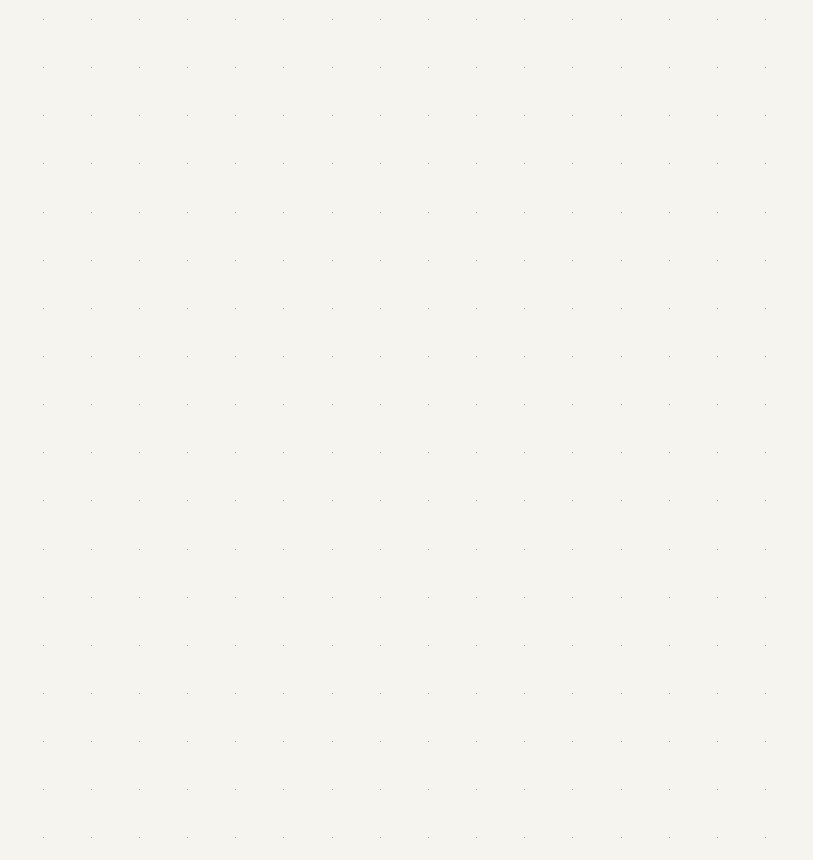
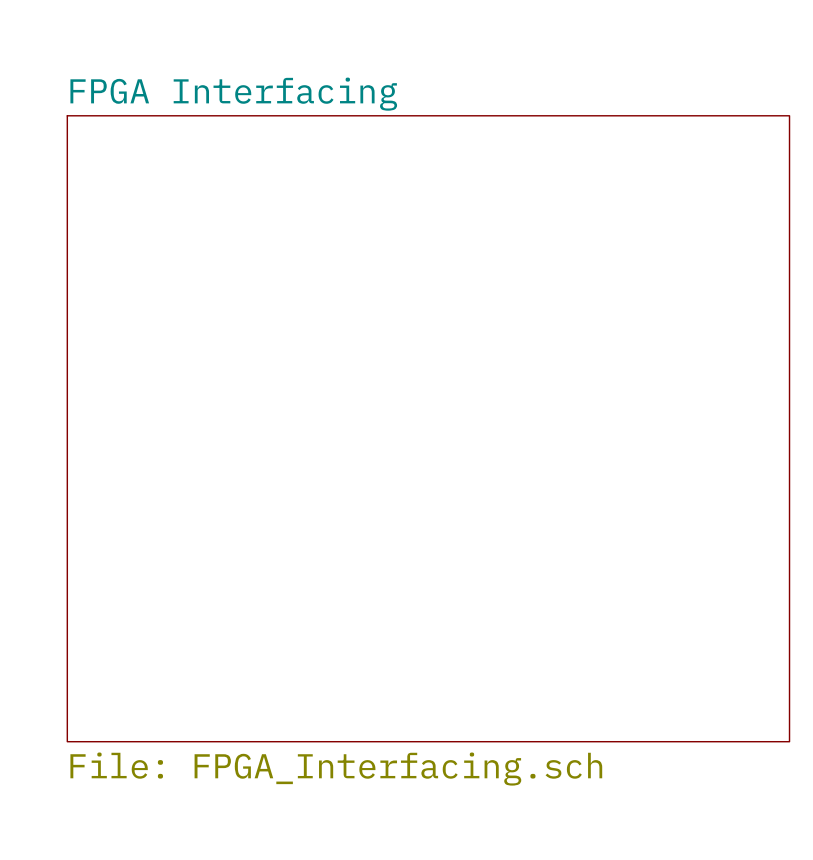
sheet FPGA Interfacing: none -> File: FPGA_Interfacing.sch (428, 428)

